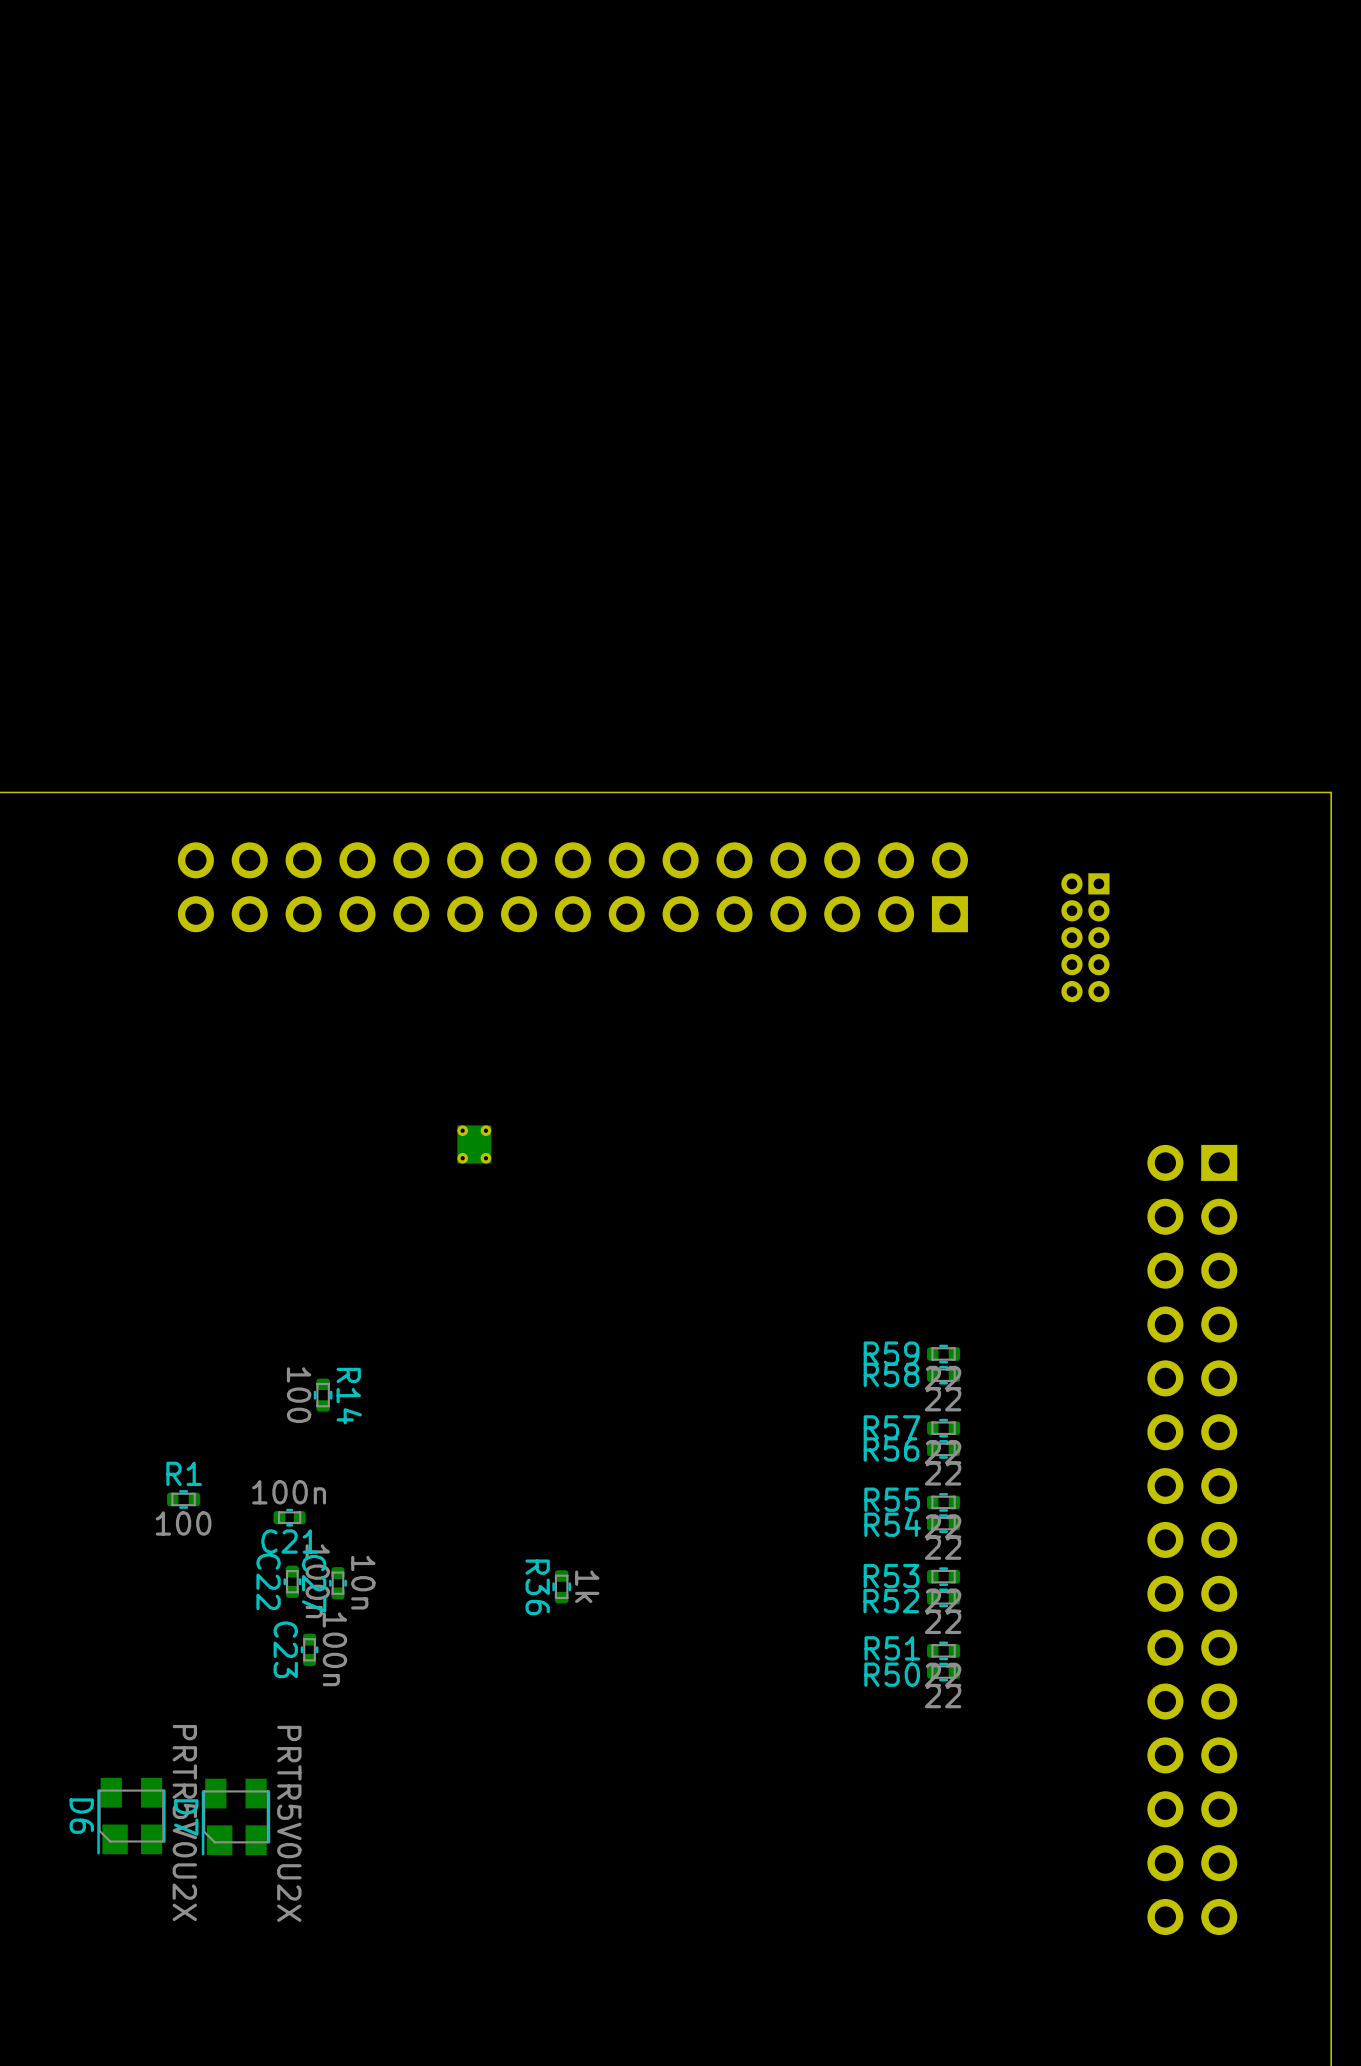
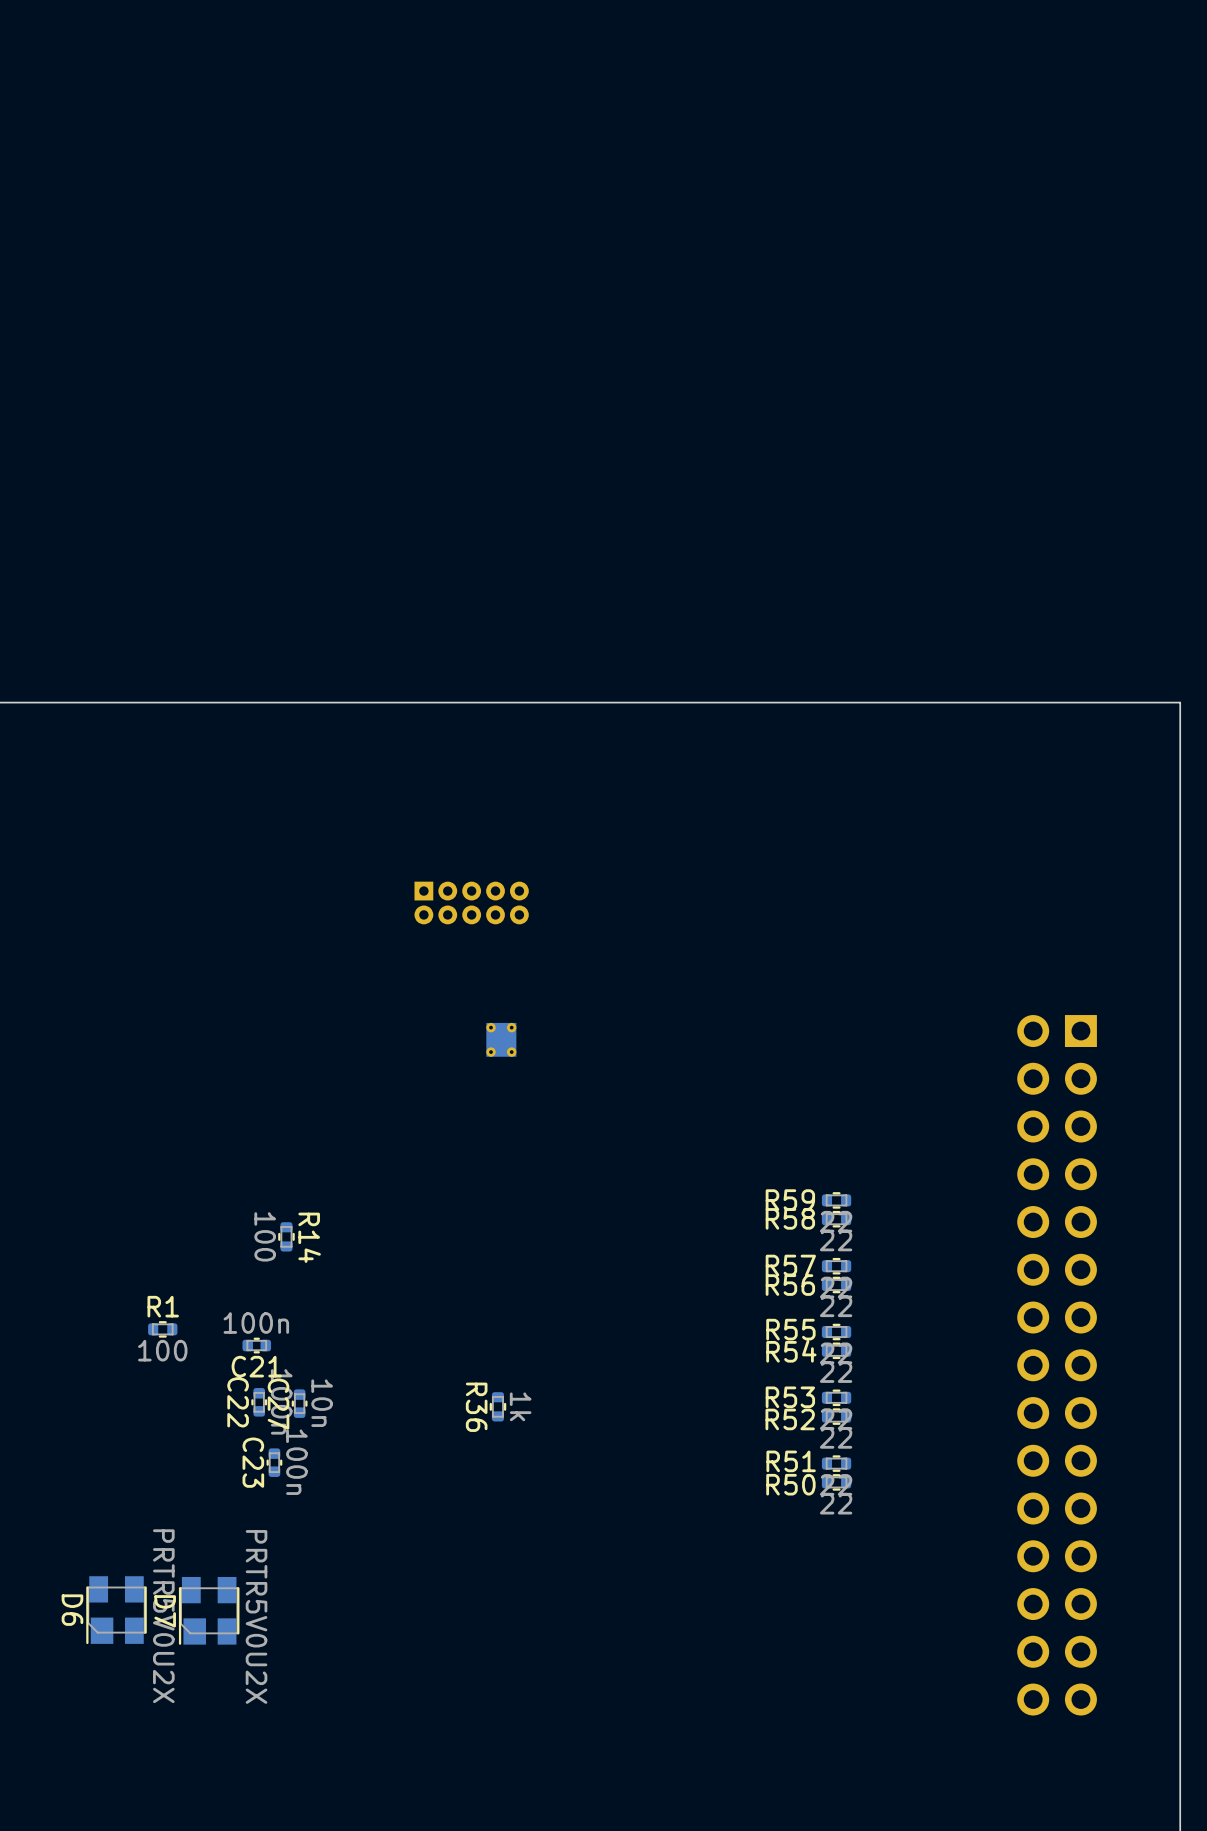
part: (572, 887) -> none
part: (1085, 937) -> none
part: none -> (471, 902)
part position: (474, 1144) -> (501, 1039)

